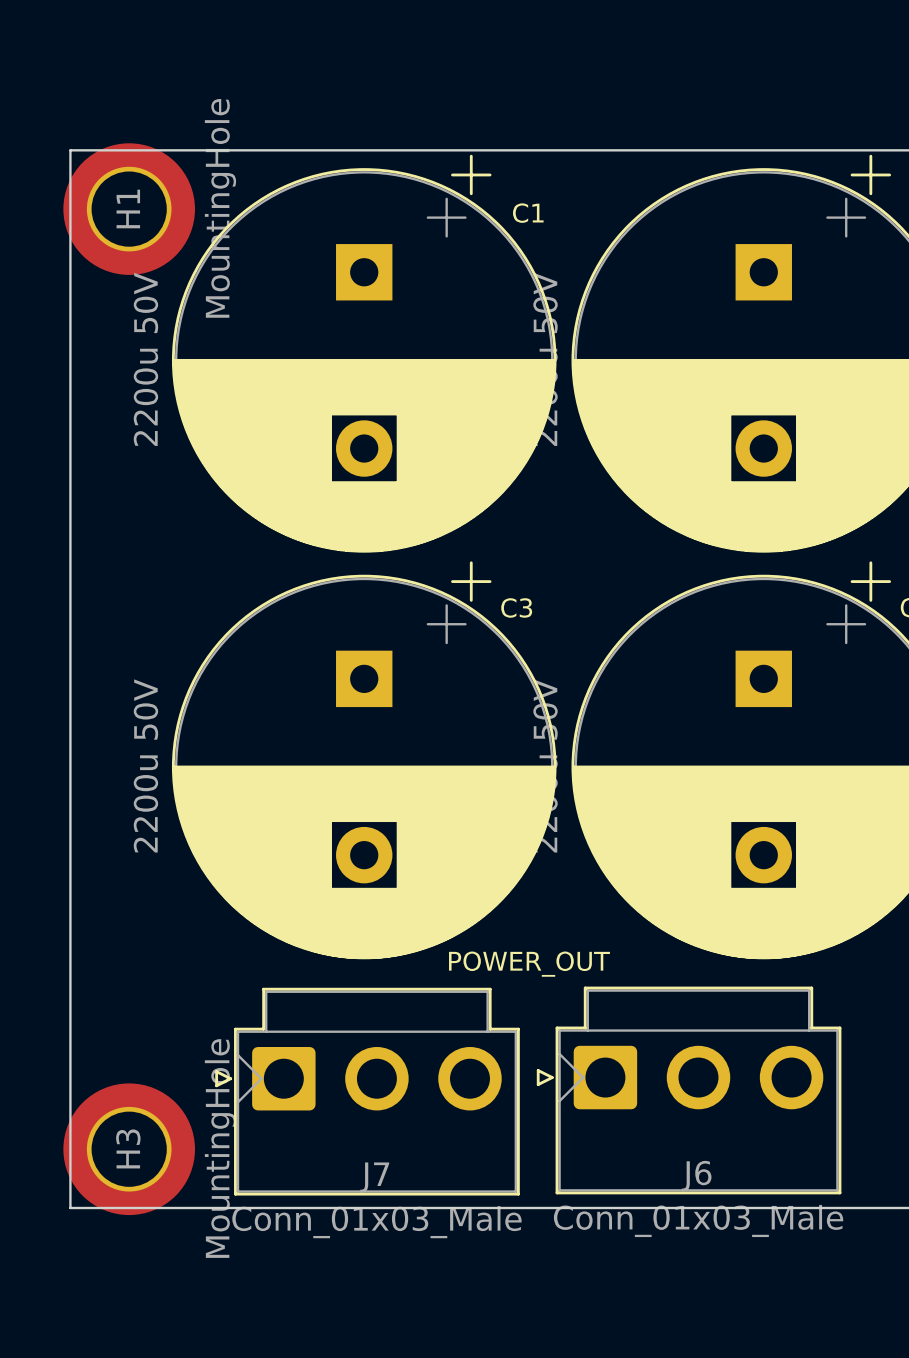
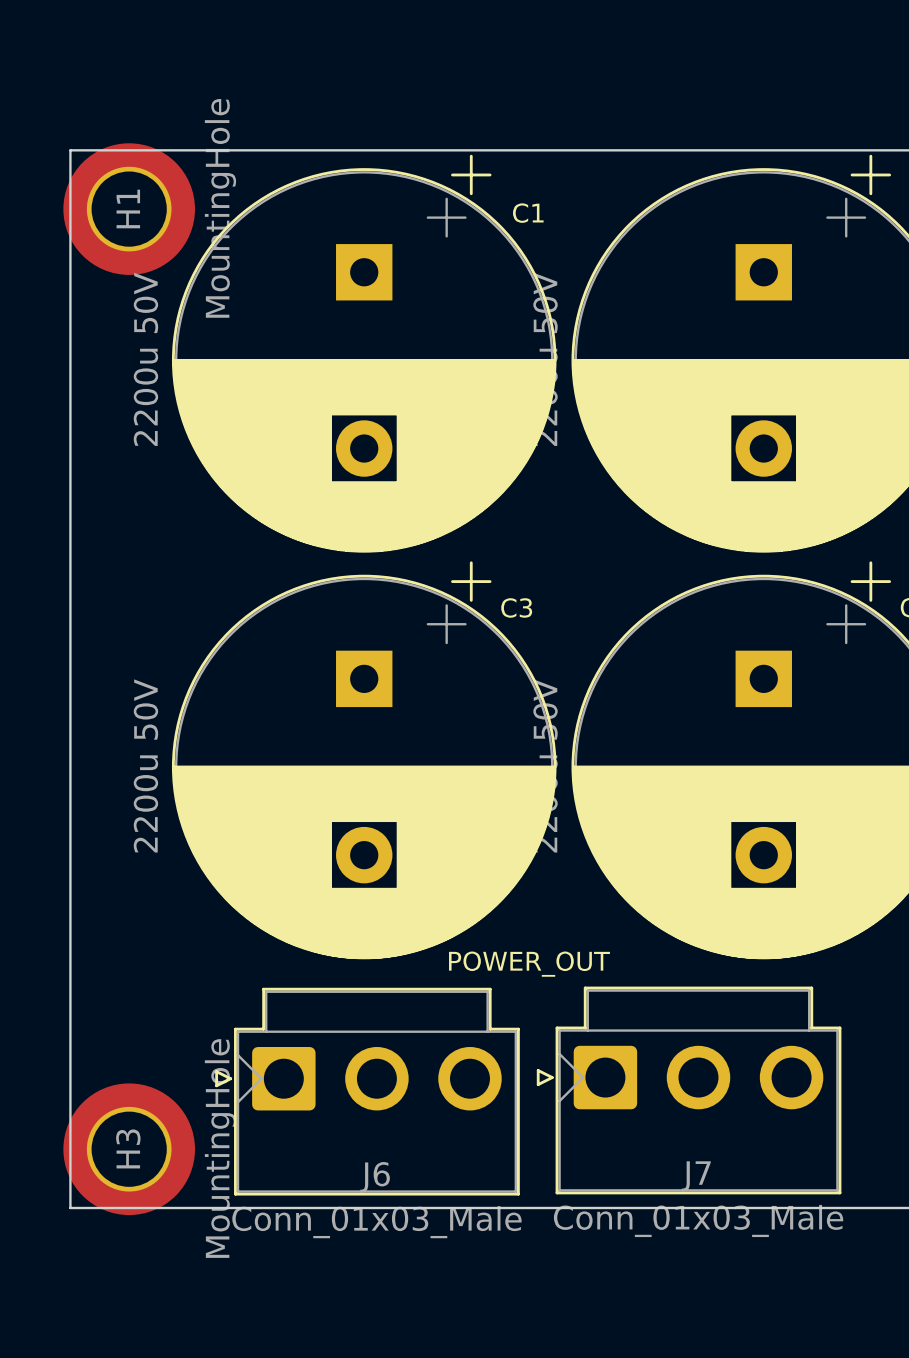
J6 name: J6 (696, 1176) -> J7 (696, 1176)
J7 name: J7 (374, 1177) -> J6 (375, 1177)

